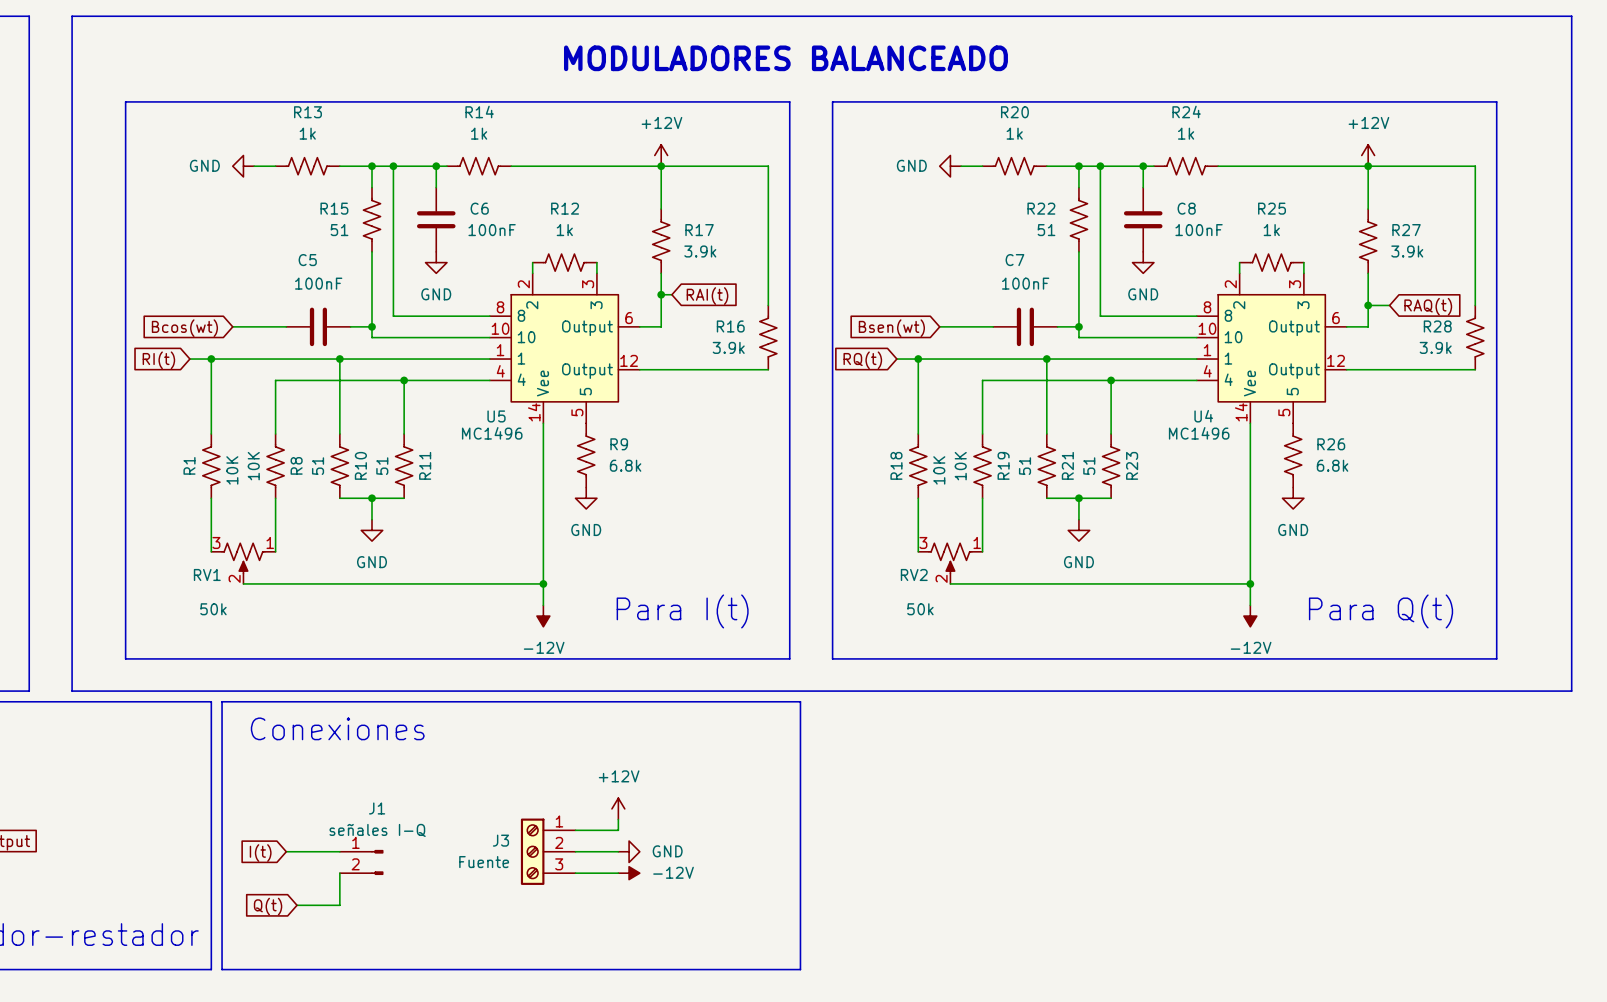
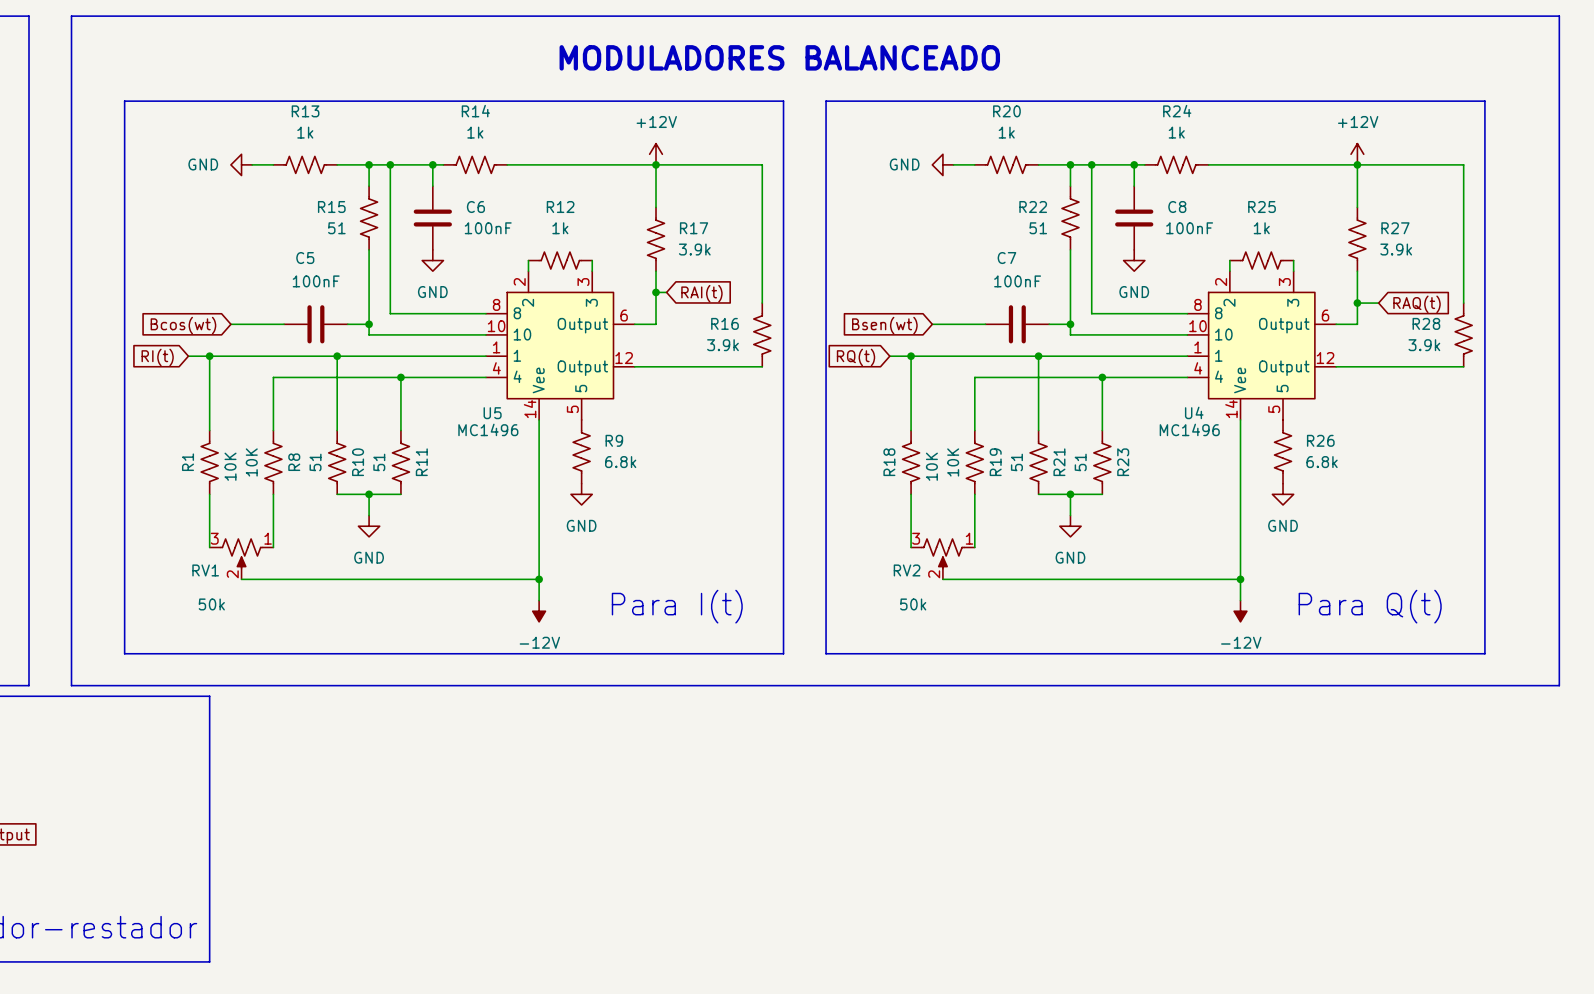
line: (222, 701) (800, 701) (800, 969) (222, 969) (222, 701) -> none
text: Conexiones (337, 728) -> none
power symbol: +12V (618, 808) -> none
wire: (618, 819) (618, 830) (575, 830) -> none
wire: (286, 851) (339, 851) -> none
J3: Fuente (548, 851) -> none
wire: (575, 851) (618, 851) -> none
power symbol: GND (629, 851) -> none
global label: I(t) (260, 853) -> none
J1: señales I-Q (361, 862) -> none
wire: (339, 873) (339, 905) (297, 905) -> none
wire: (575, 873) (618, 873) -> none
power symbol: -12V (629, 873) -> none
global label: Q(t) (268, 906) -> none

